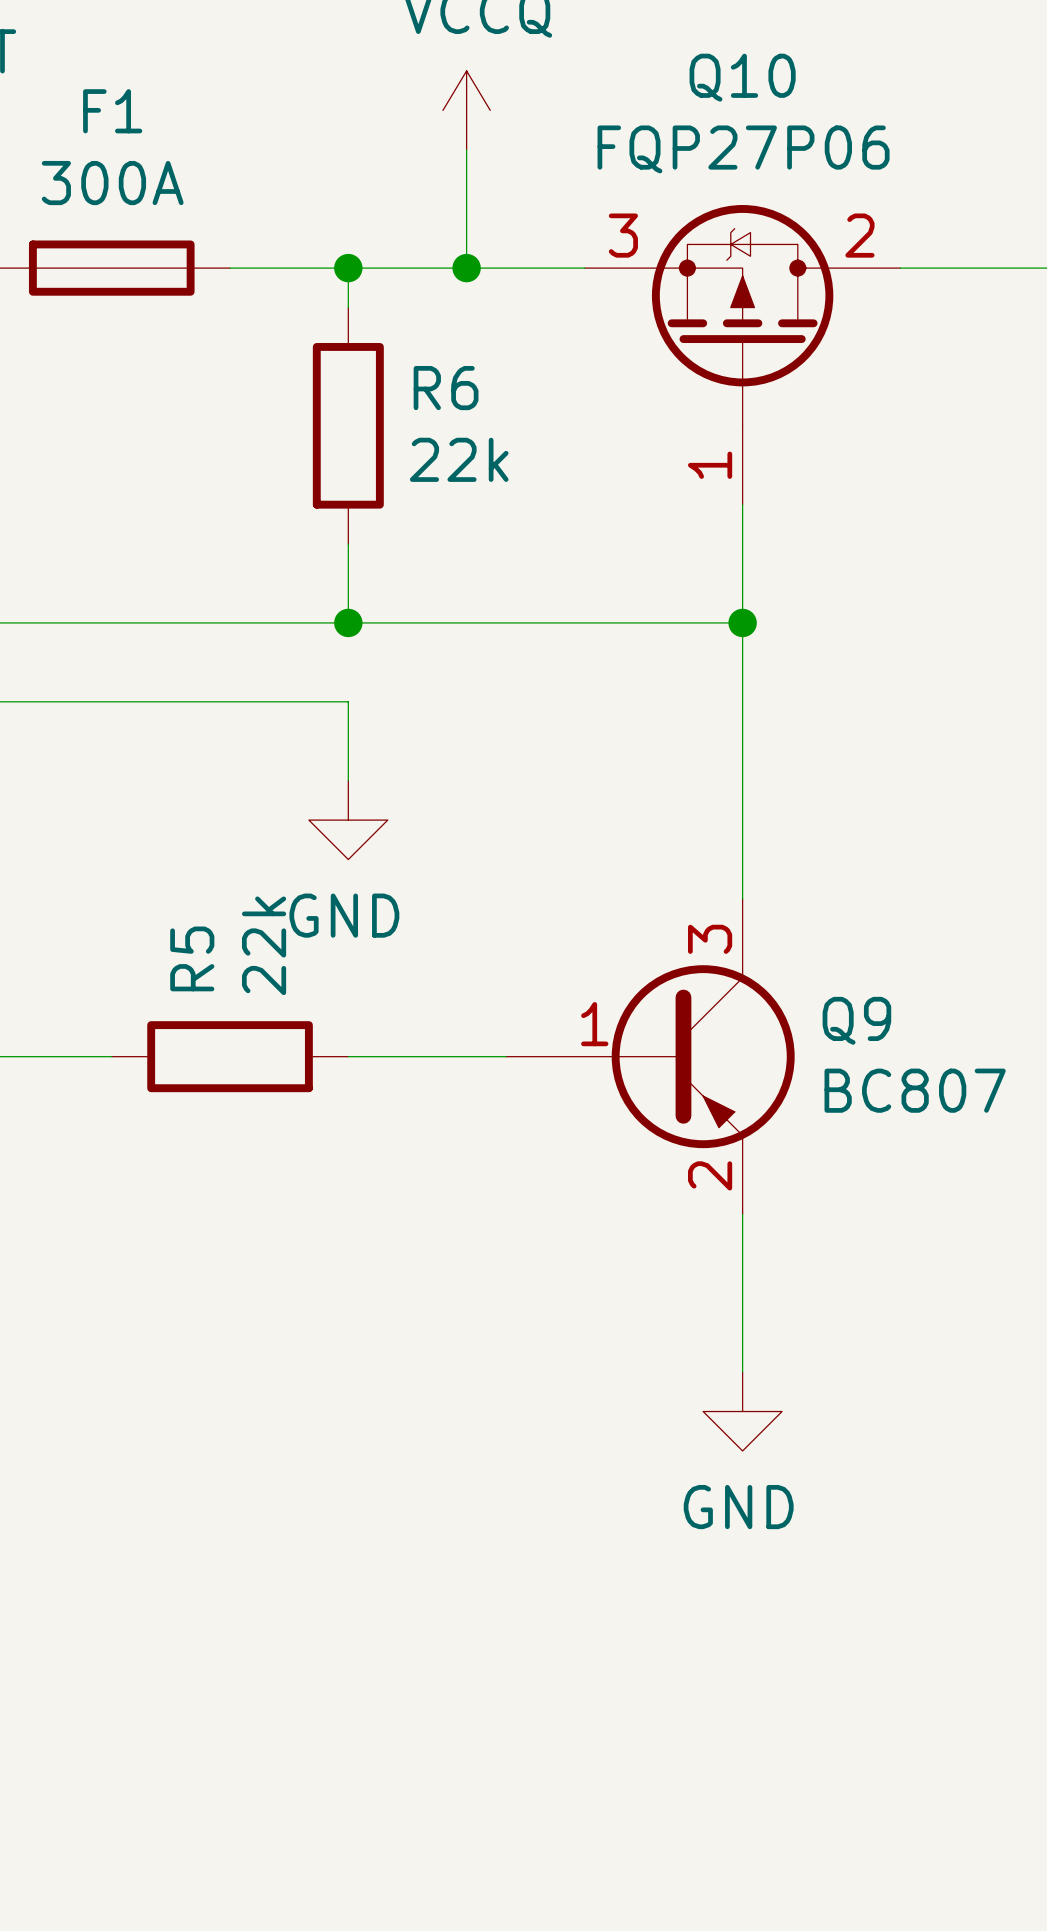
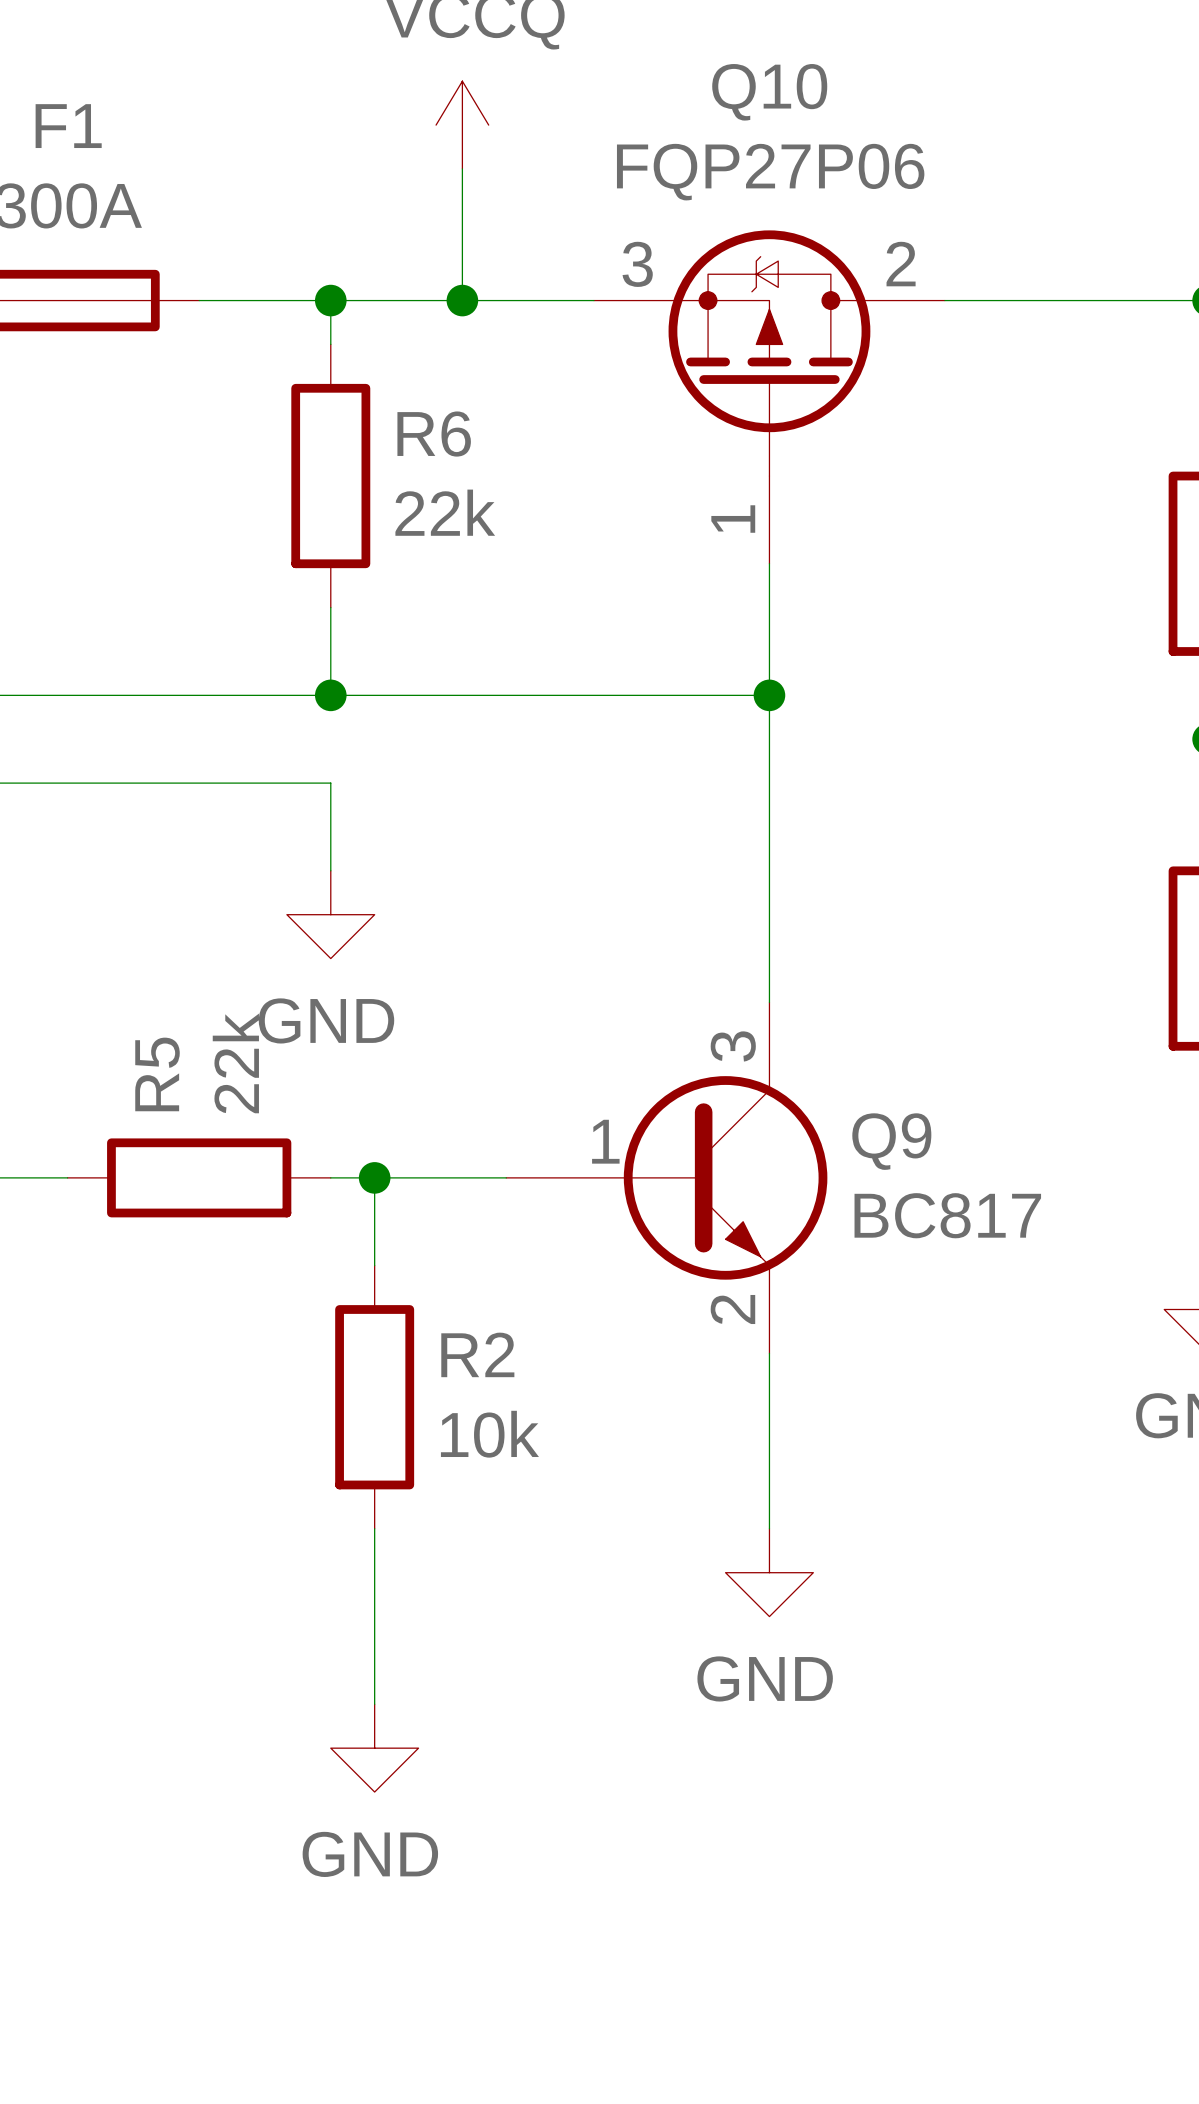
Q9 symbol: [506, 898, 795, 1215] -> [506, 1002, 828, 1354]
wire: none -> (374, 1177) (374, 1265)
junction: none -> (374, 1177)
Q9 value: BC807 (915, 1090) -> BC817 (947, 1215)
R2: none -> 10k (374, 1397)
wire: none -> (374, 1528) (374, 1704)
power symbol: none -> GND (374, 1748)

